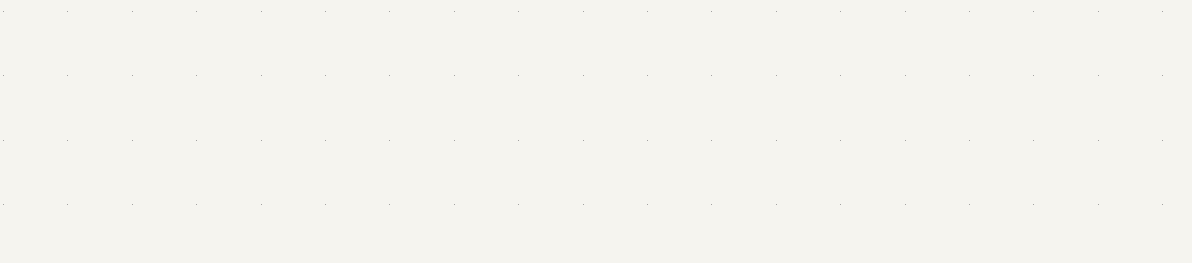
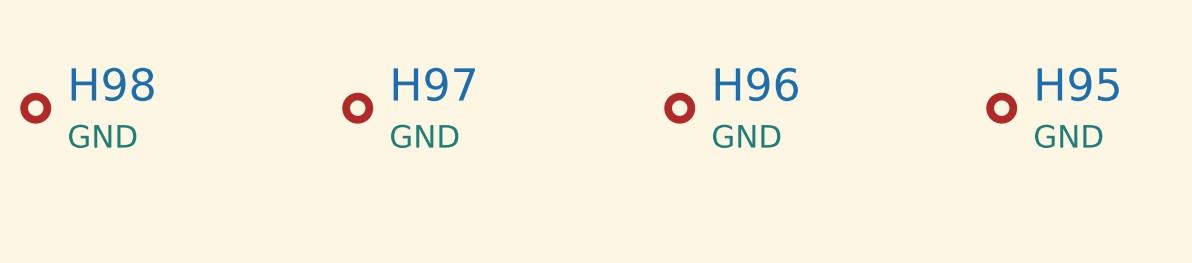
H98: none -> GND (35, 108)
H97: none -> GND (357, 108)
H96: none -> GND (679, 108)
H95: none -> GND (1001, 108)

